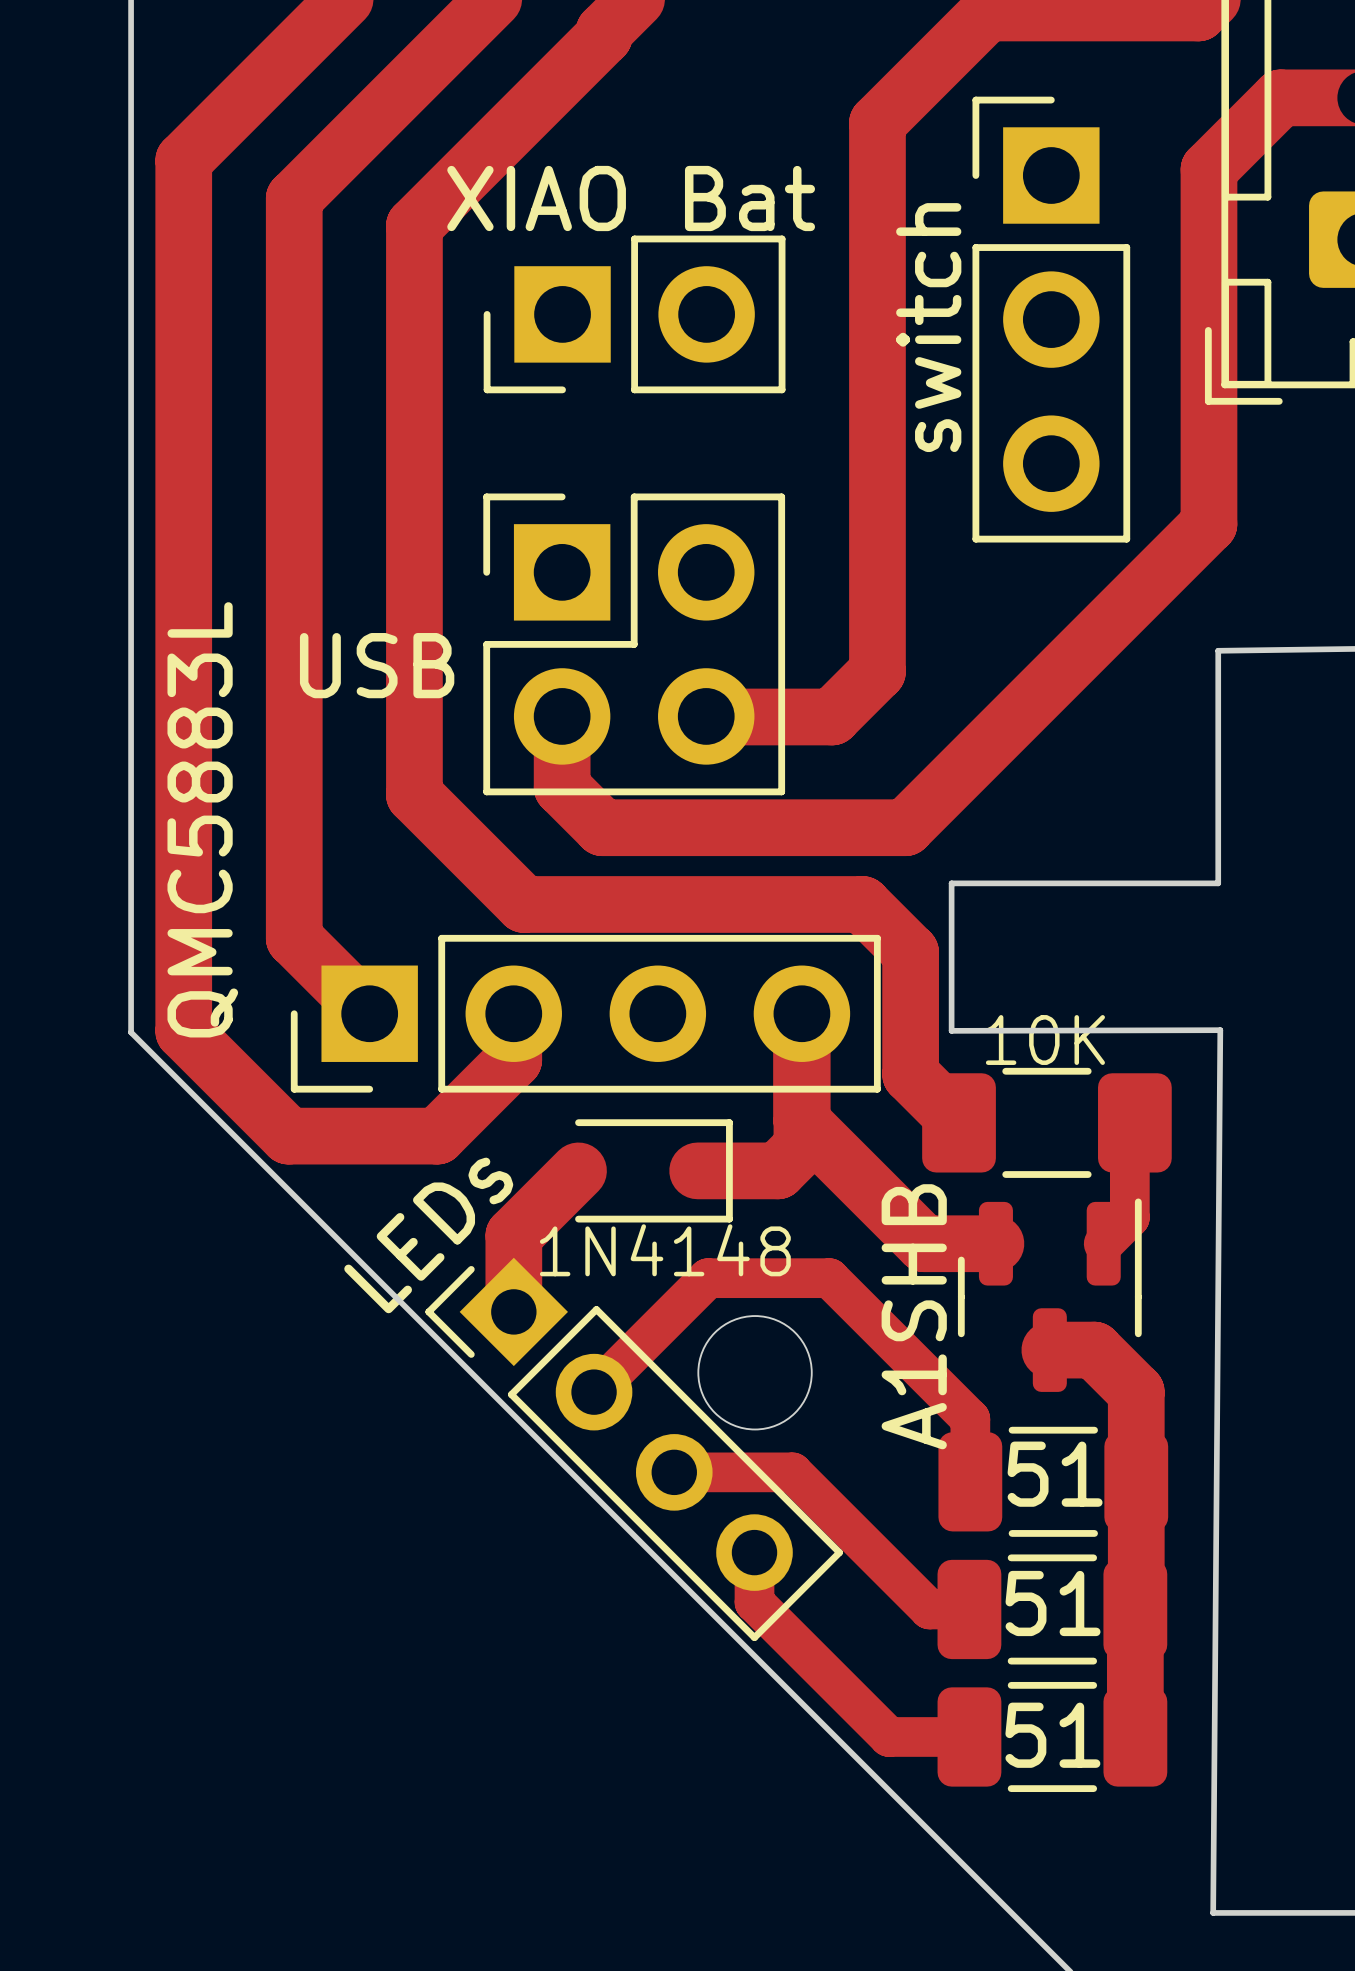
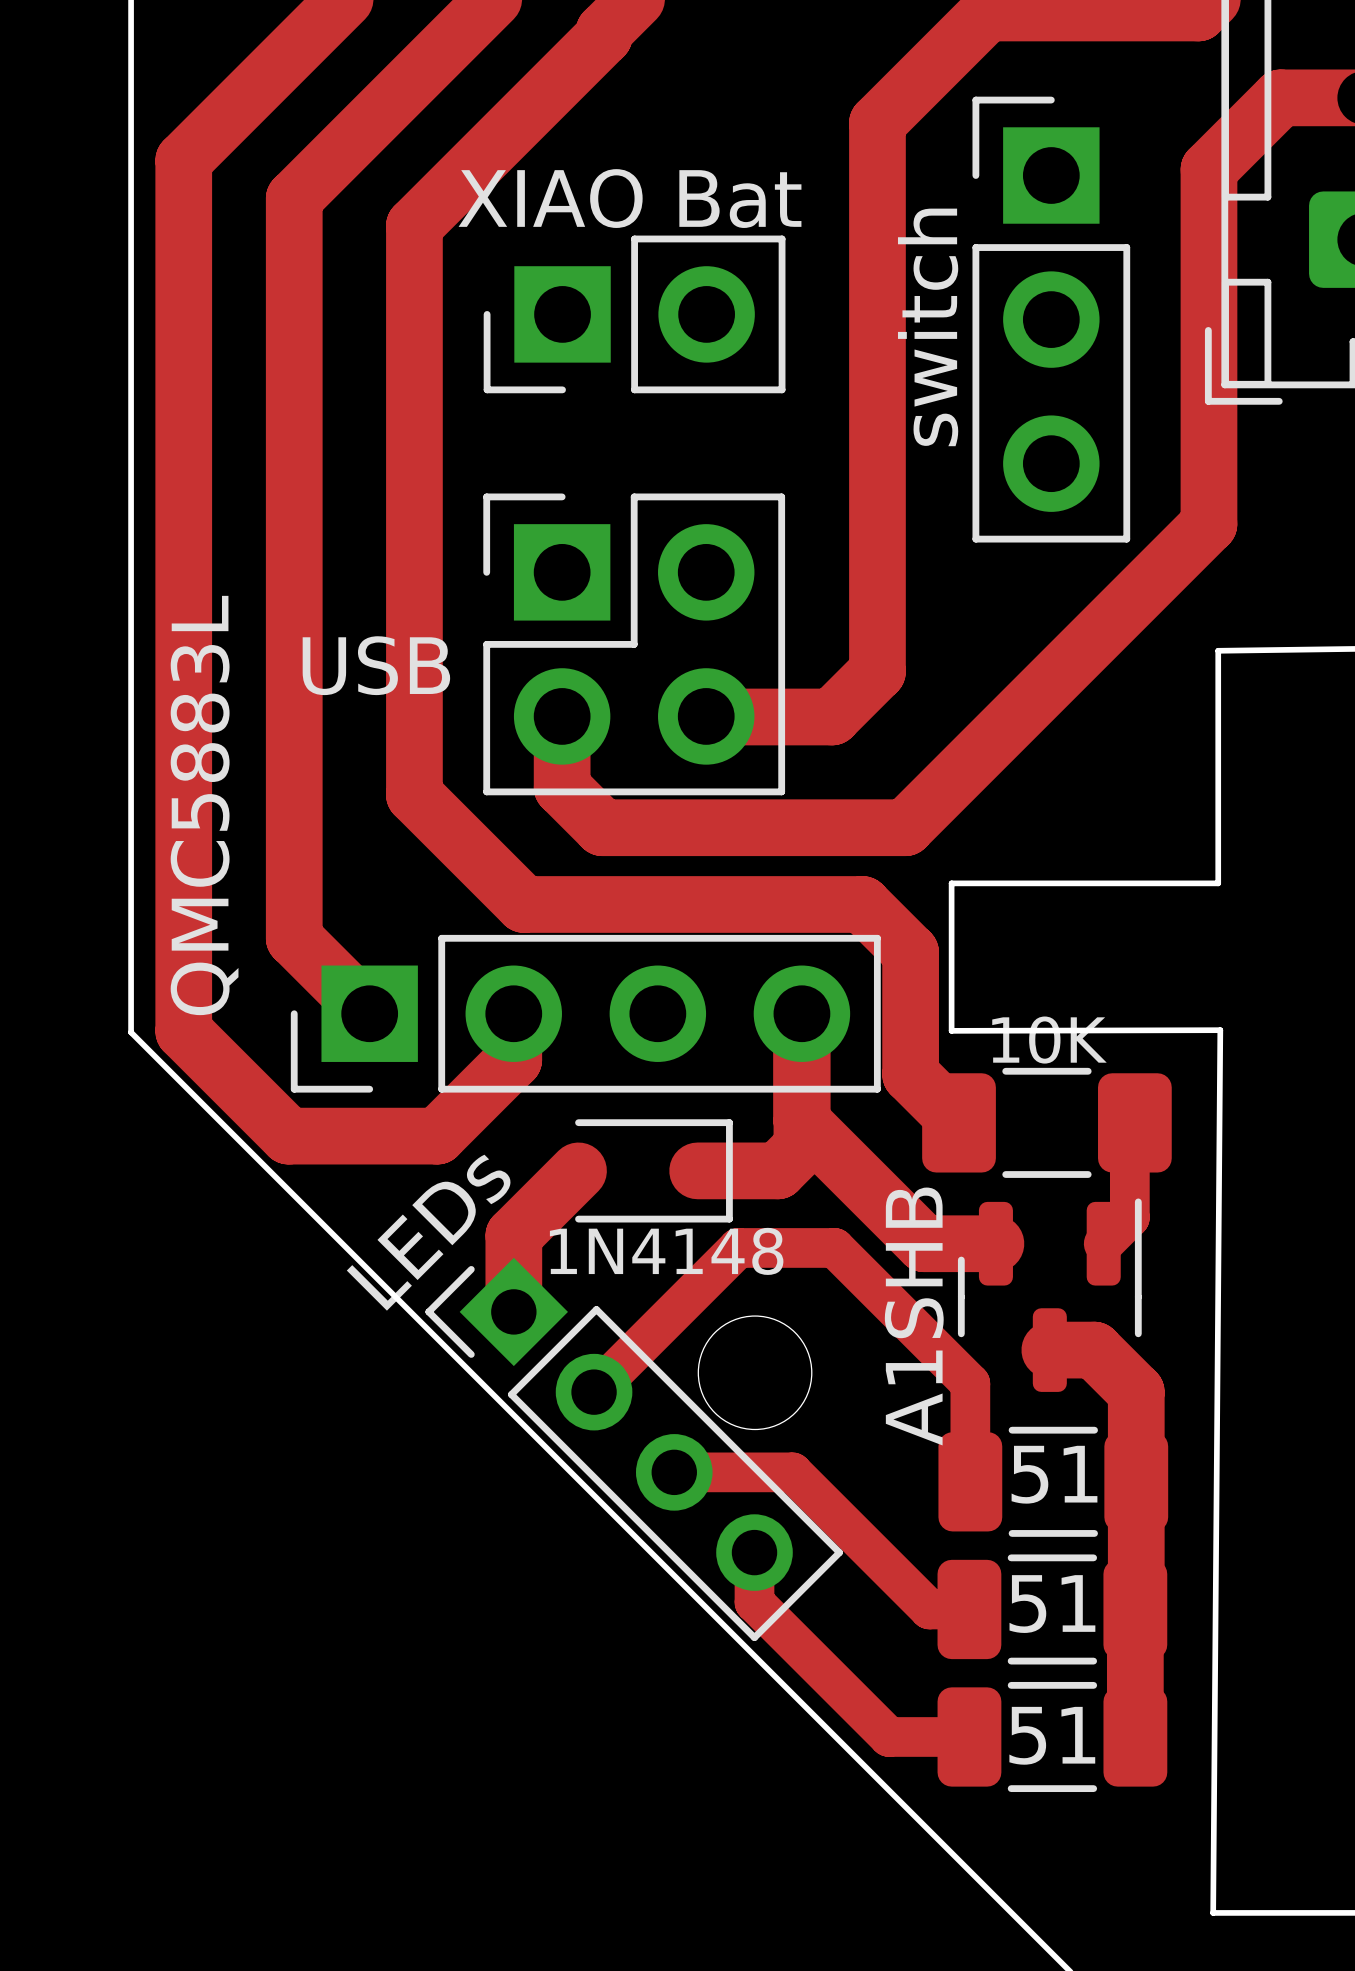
track: (708, 1278) (829, 1278) (970, 1419) -> (708, 1278) (738, 1247) (834, 1247) (970, 1383) (970, 1419)

